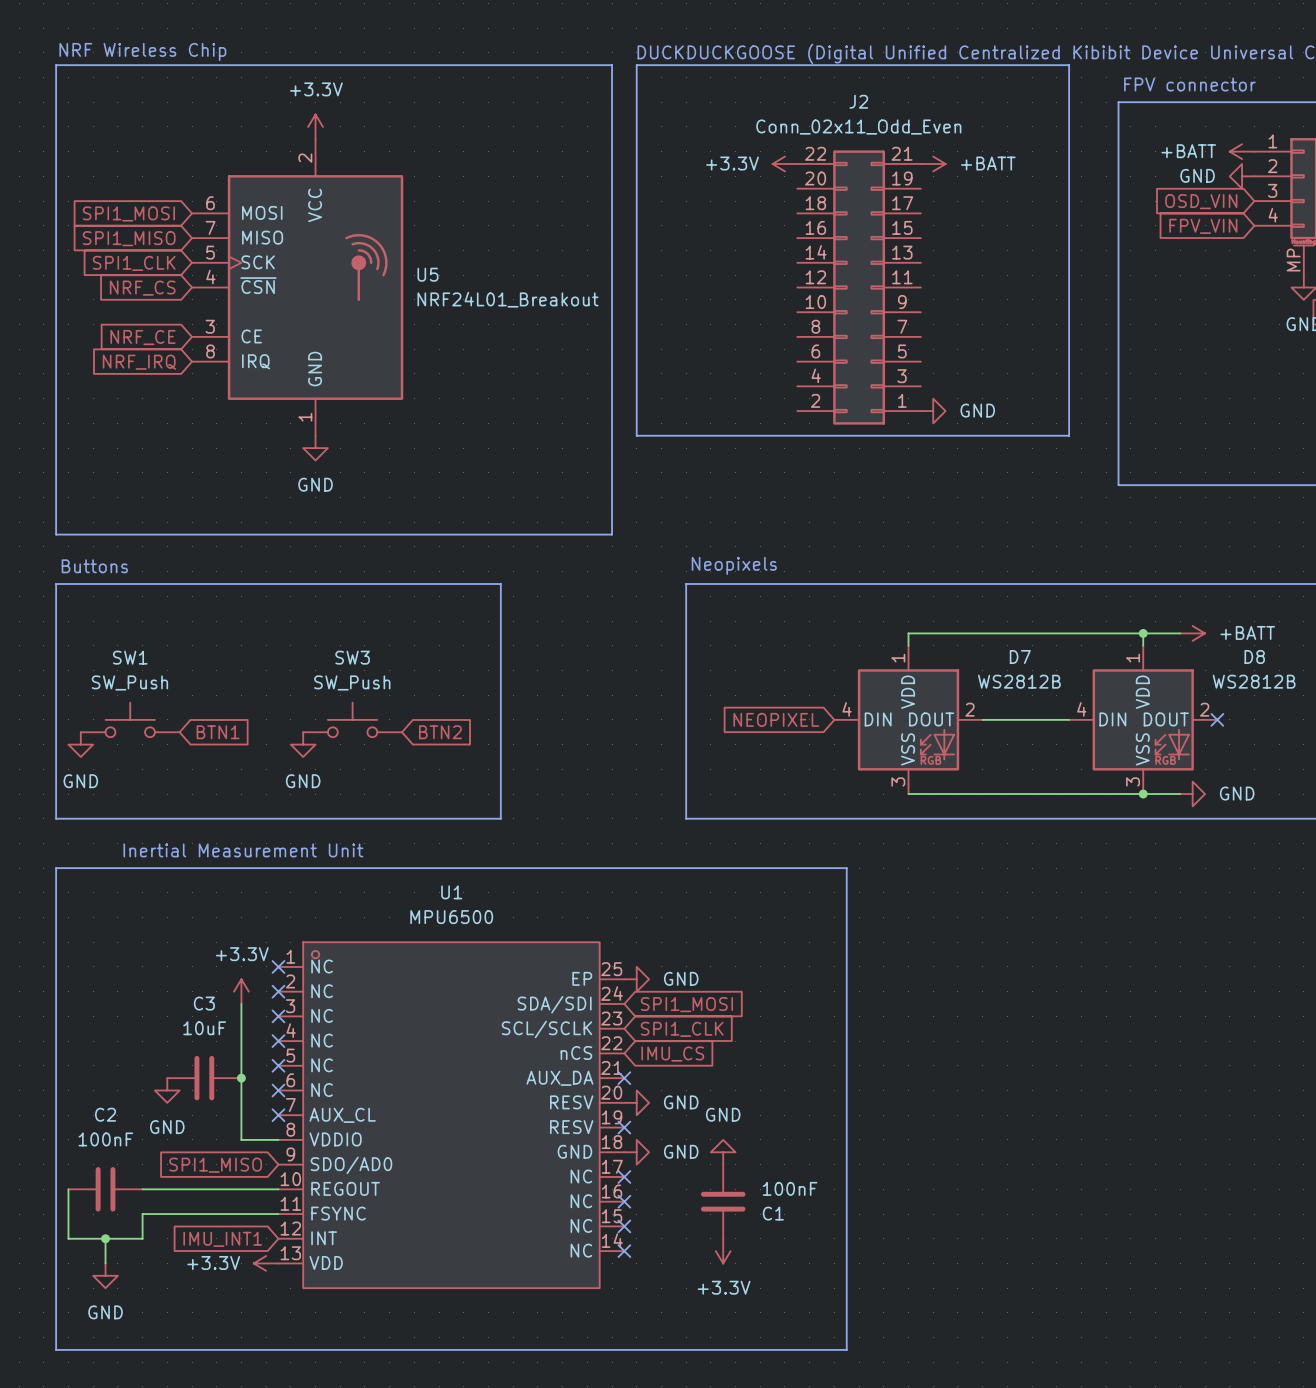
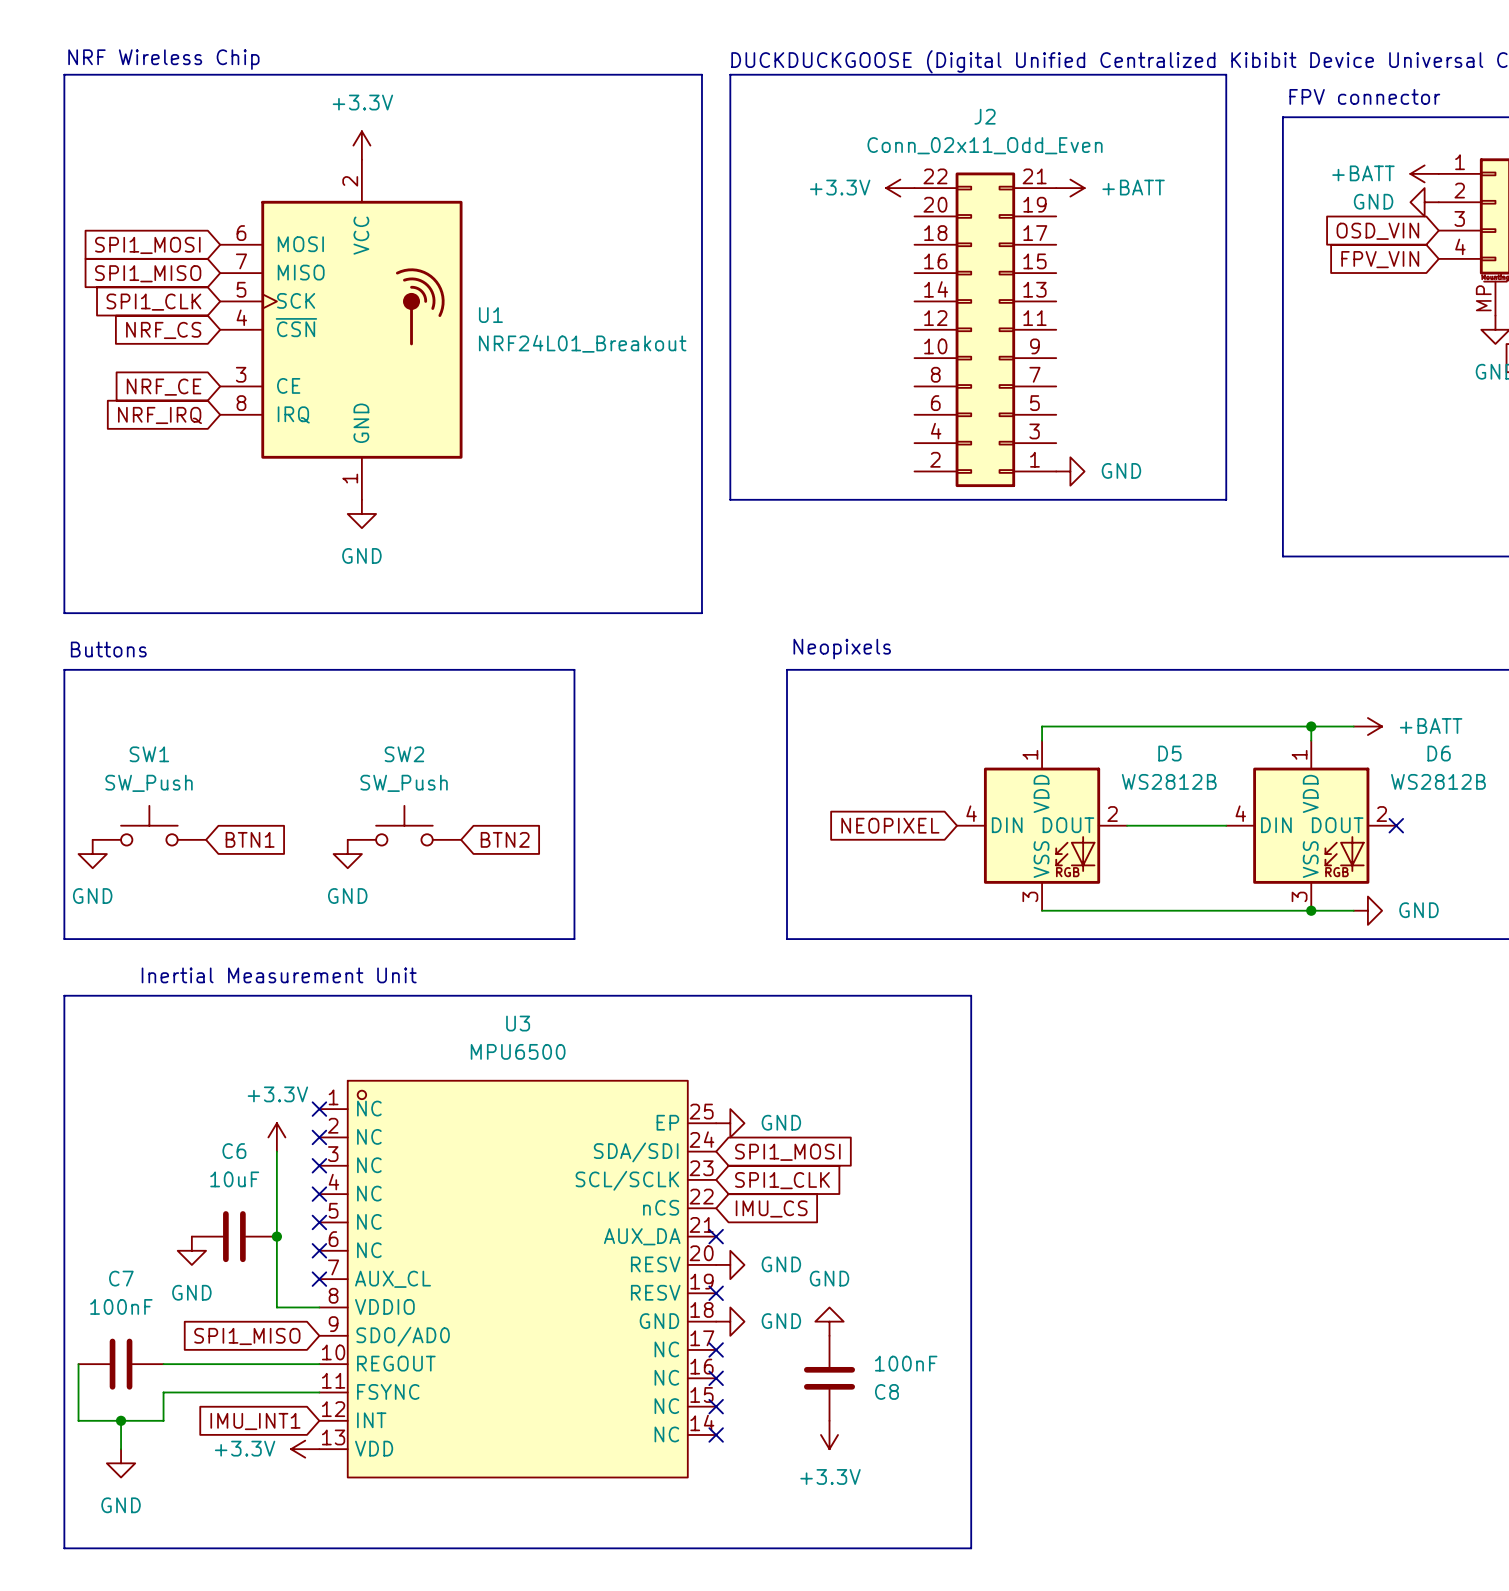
U5 name: U5 (427, 274) -> U1 (490, 315)
D7 name: D7 (1020, 656) -> D5 (1169, 753)
D8 name: D8 (1254, 656) -> D6 (1439, 753)
SW3 name: SW3 (352, 657) -> SW2 (404, 754)
U1 name: U1 (451, 892) -> U3 (518, 1023)
C3 name: C3 (204, 1003) -> C6 (234, 1151)
C2 name: C2 (105, 1114) -> C7 (121, 1278)
C1 name: C1 (773, 1213) -> C8 (886, 1391)

